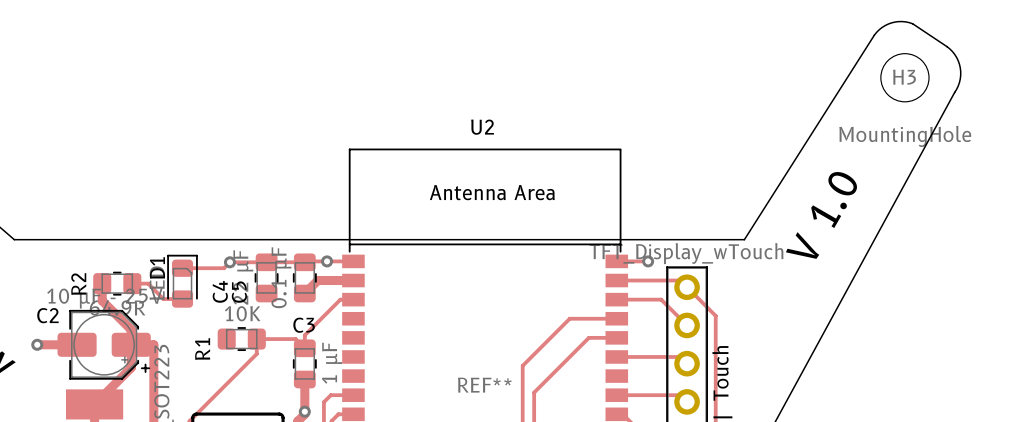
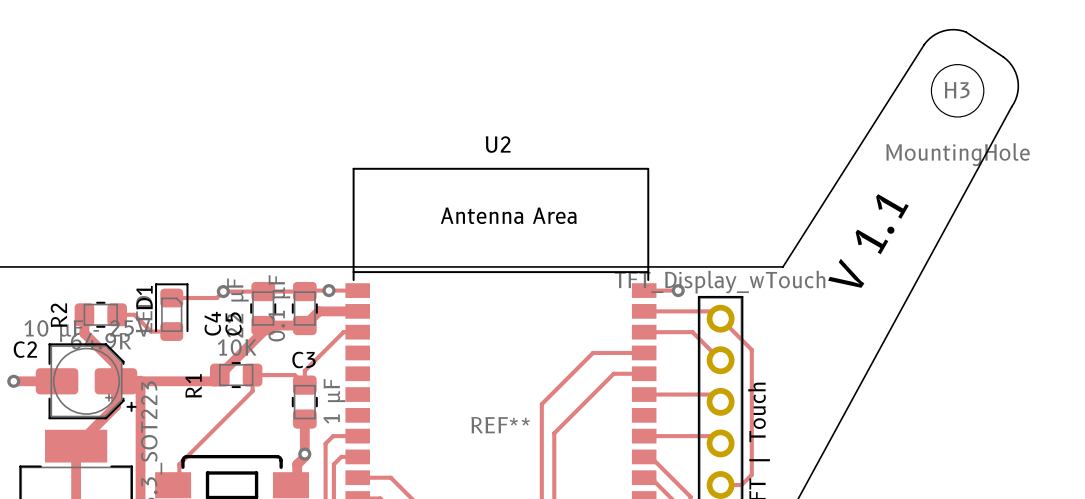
text: V 1.0 (821, 215) -> V 1.1 (868, 241)
track: none -> (304, 325) (263, 325) (263, 331) (213, 381) (140, 381)

